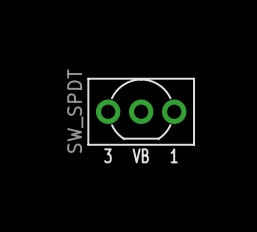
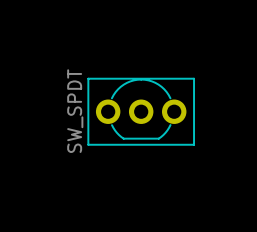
text: 3 (107, 155) -> none
text: VB (140, 155) -> none
text: 1 (174, 155) -> none

